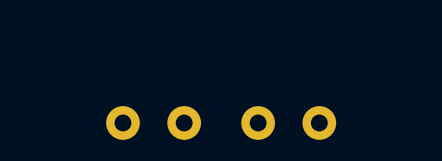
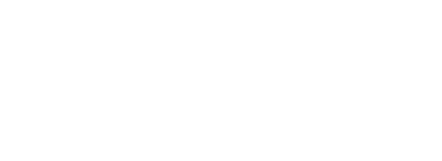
part: (153, 122) -> none
part: (288, 122) -> none

